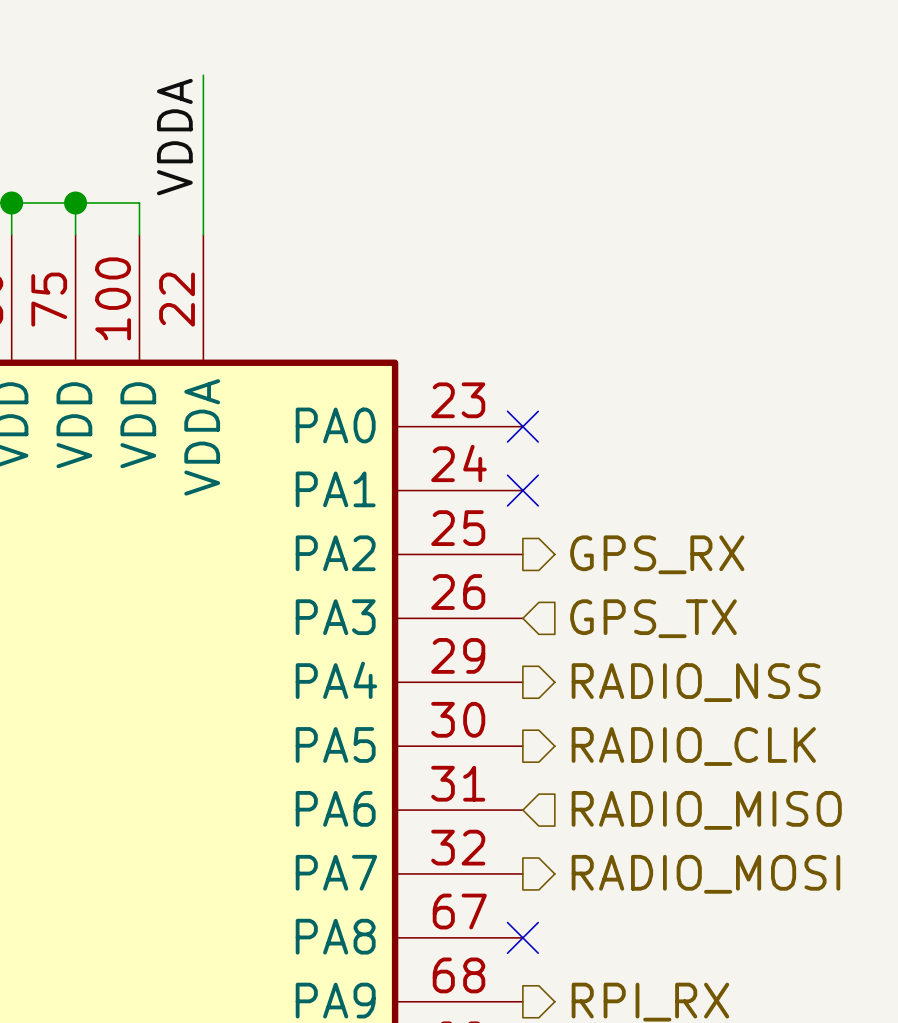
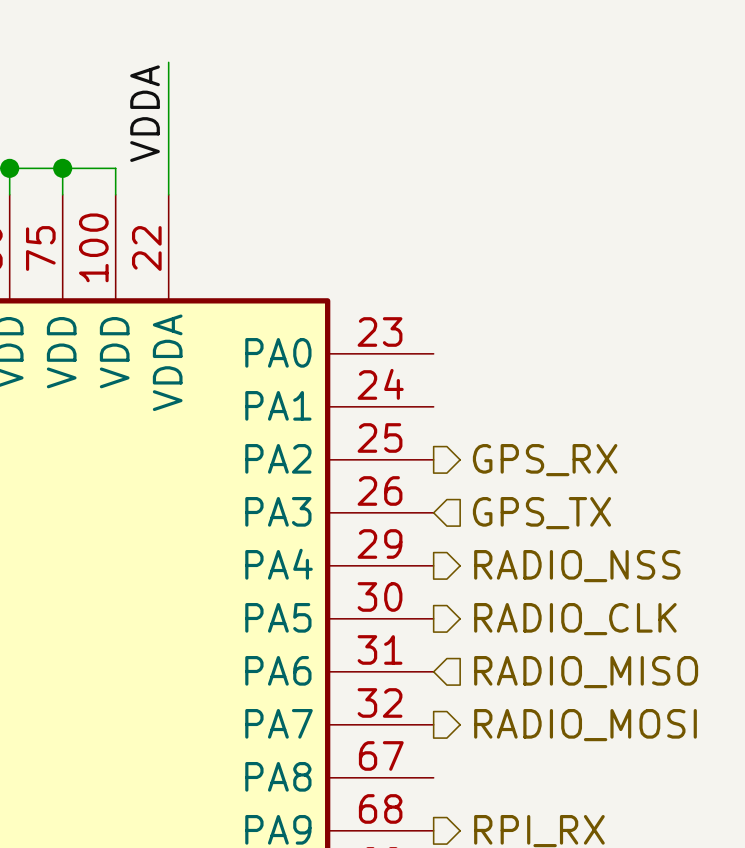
no-connect mark: (522, 426) -> none
no-connect mark: (522, 490) -> none
no-connect mark: (522, 937) -> none

